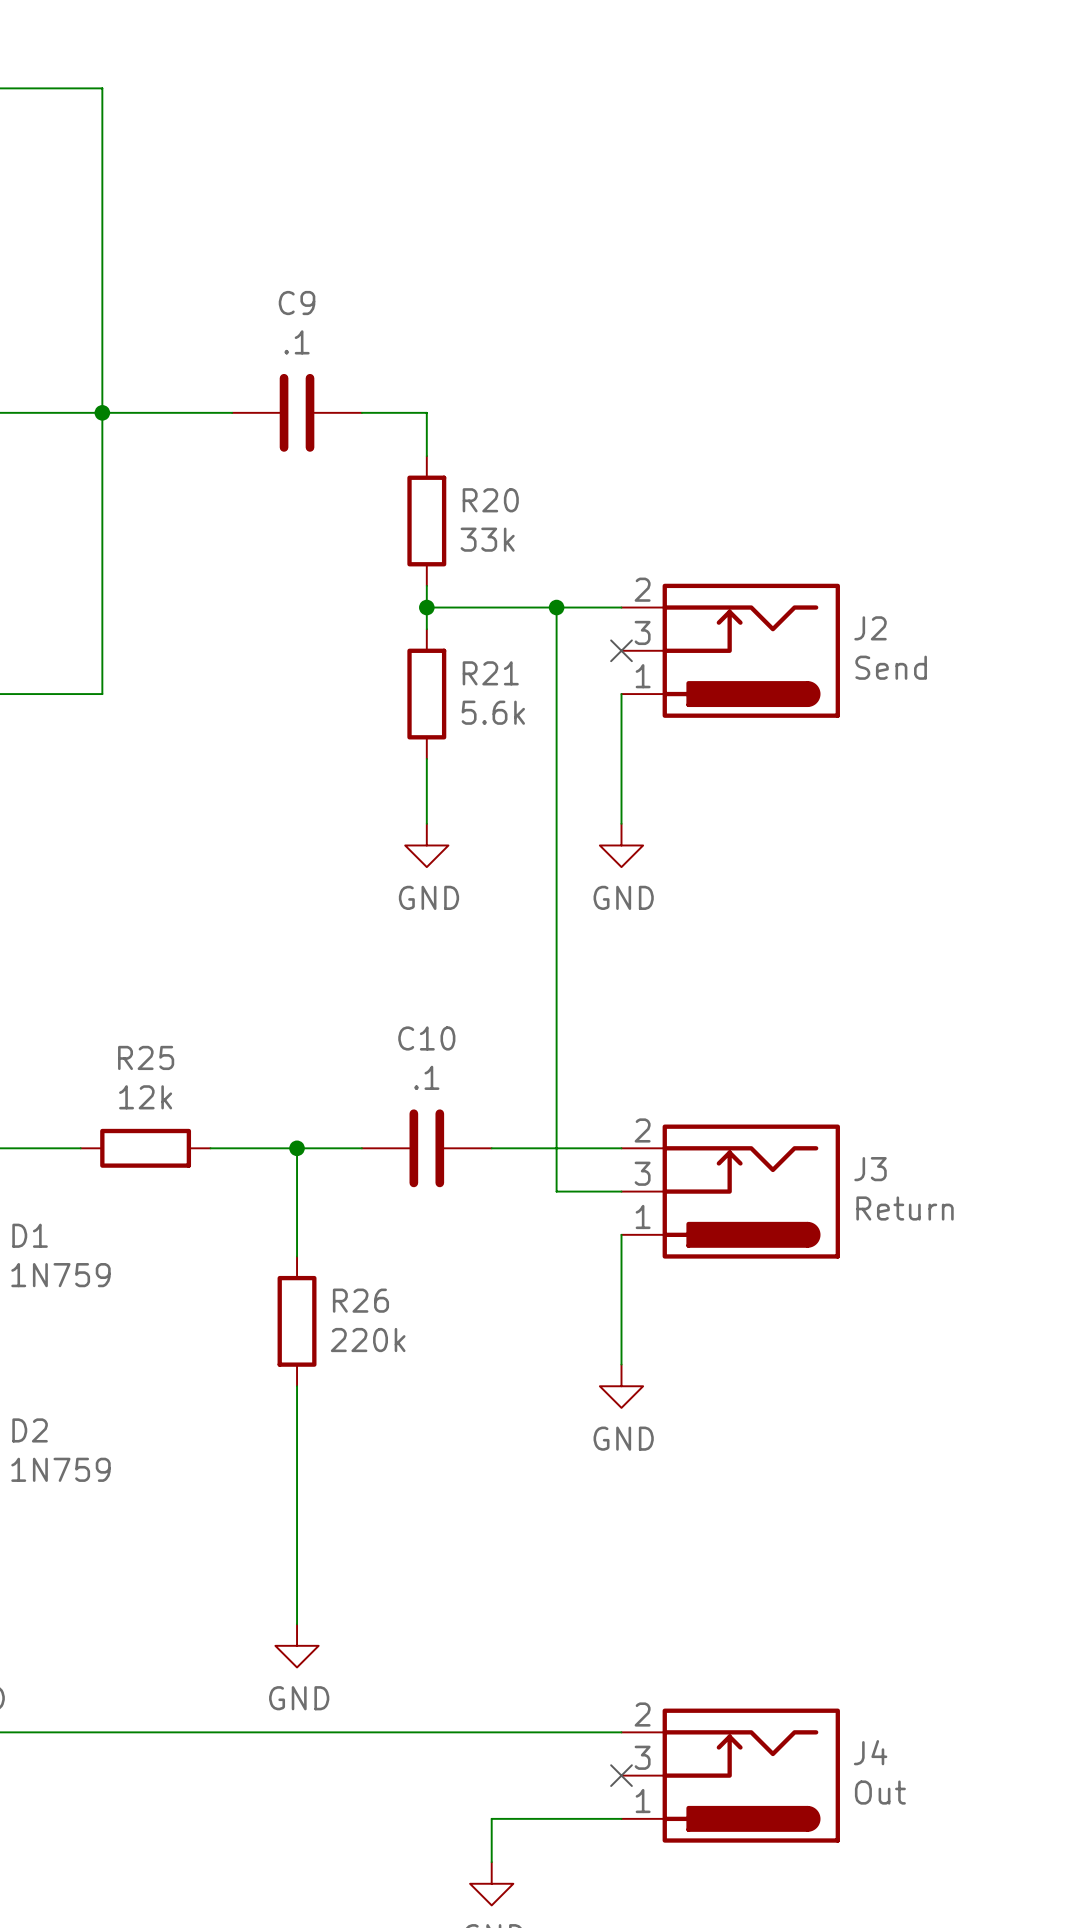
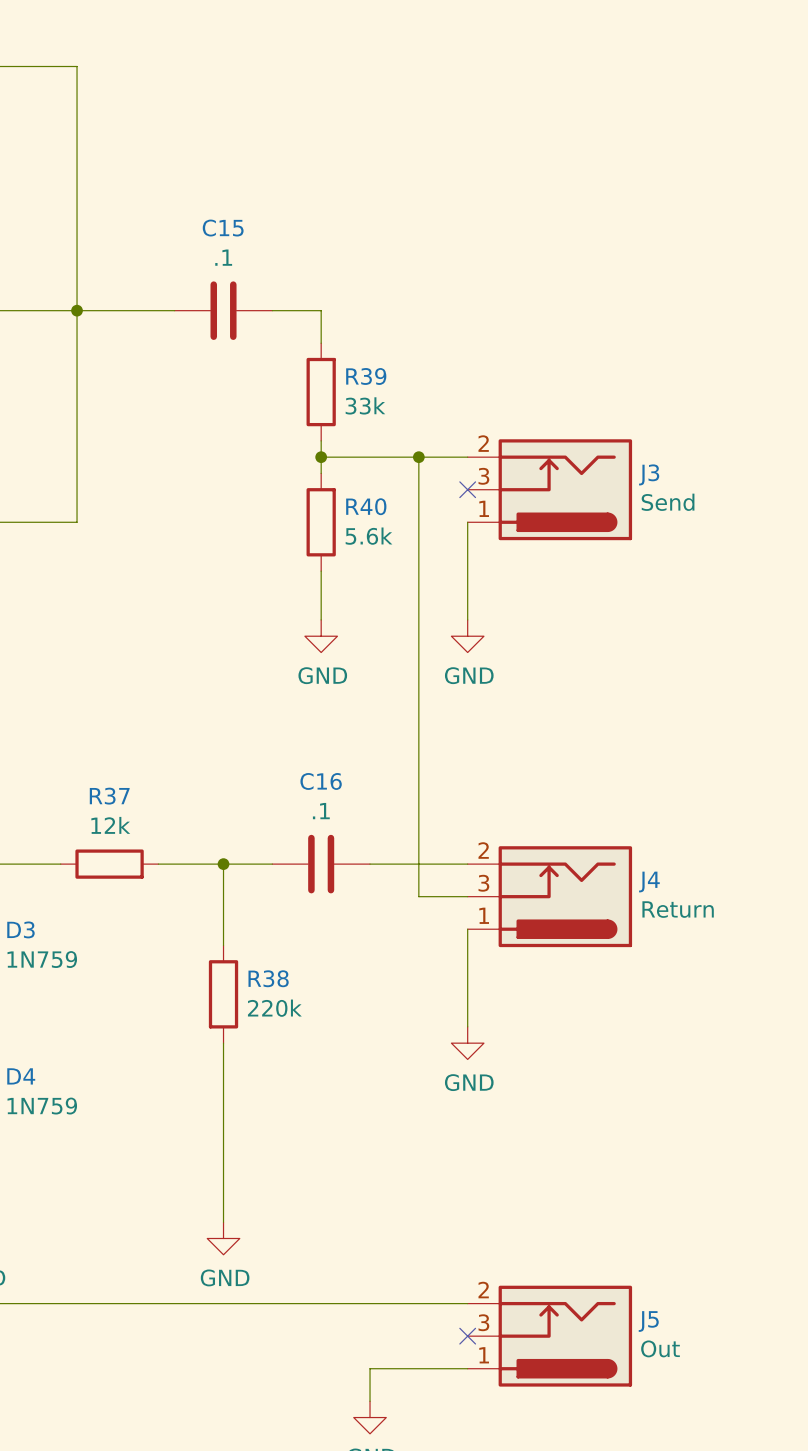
C9 name: C9 (297, 303) -> C15 (223, 228)
R20 name: R20 (490, 500) -> R39 (366, 376)
J2 name: J2 (870, 628) -> J3 (649, 474)
R21 name: R21 (490, 673) -> R40 (366, 506)
C10 name: C10 (426, 1038) -> C16 (321, 781)
R25 name: R25 (146, 1057) -> R37 (109, 796)
J3 name: J3 (870, 1169) -> J4 (649, 882)
D1 name: D1 (30, 1235) -> D3 (20, 929)
R26 name: R26 (360, 1300) -> R38 (268, 978)
D2 name: D2 (30, 1430) -> D4 (21, 1076)
J4 name: J4 (870, 1752) -> J5 (648, 1321)

